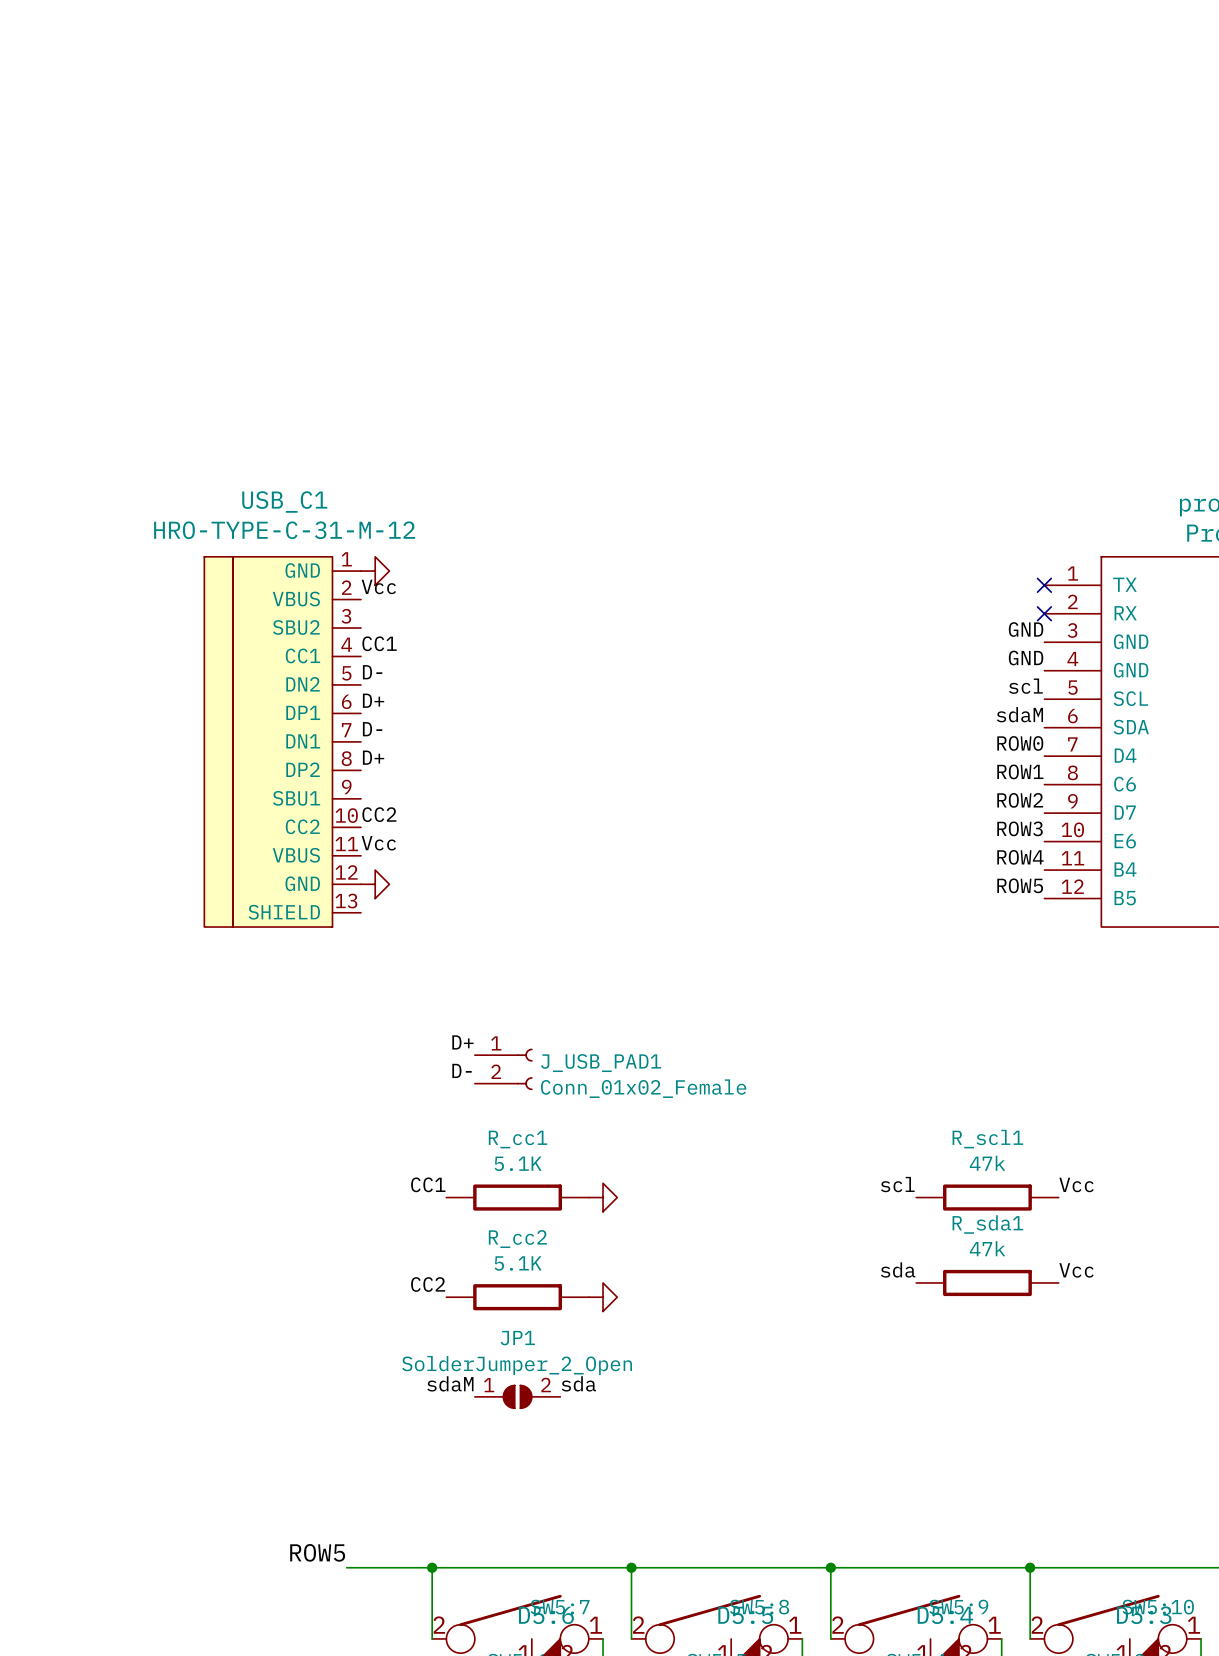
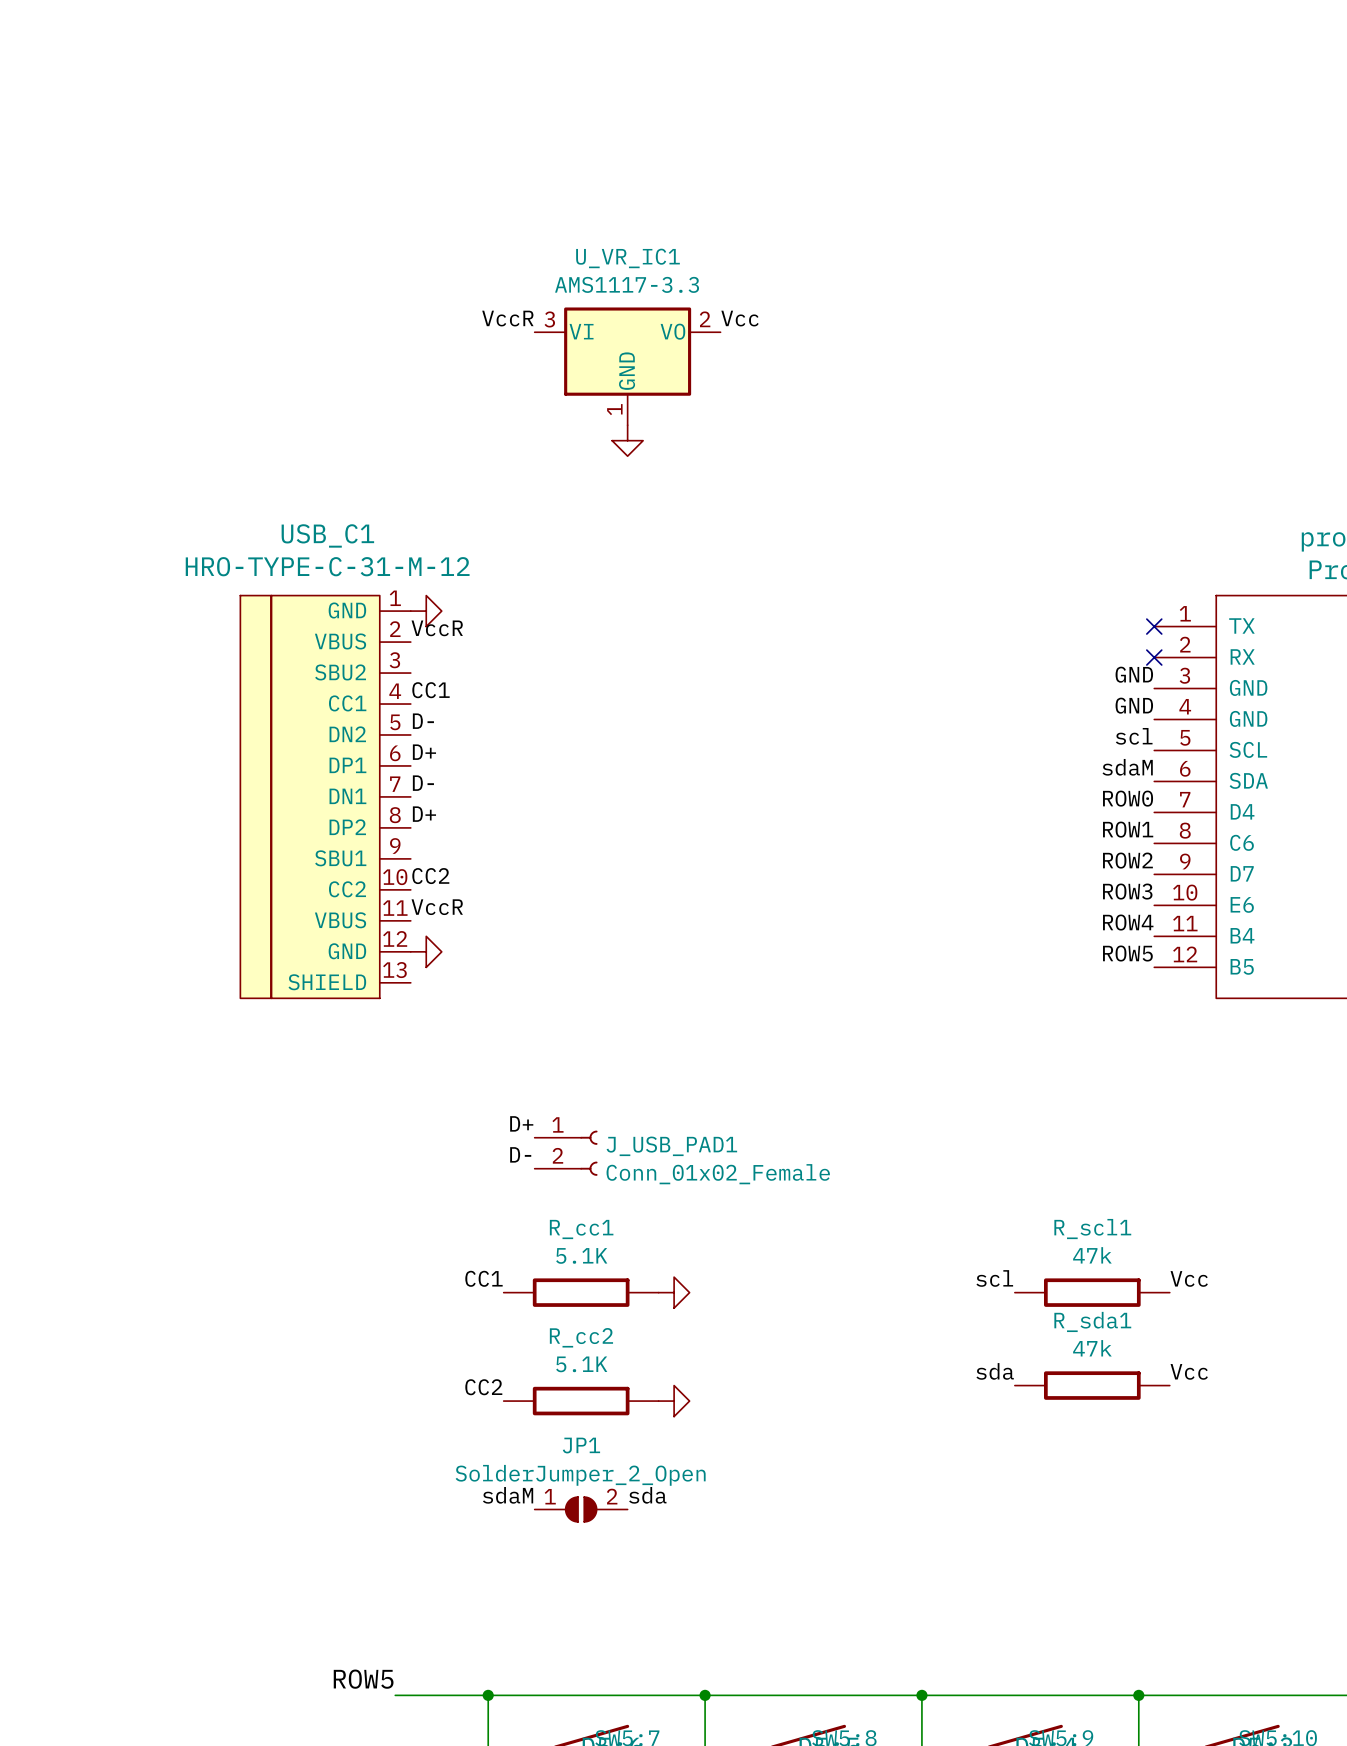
label: none -> VccR (507, 318)
label: none -> Vcc (740, 318)
U_VR_IC1: none -> AMS1117-3.3 (627, 366)
power symbol: none -> (627, 440)
label: Vcc (378, 586) -> VccR (437, 628)
label: Vcc (378, 843) -> VccR (437, 907)

